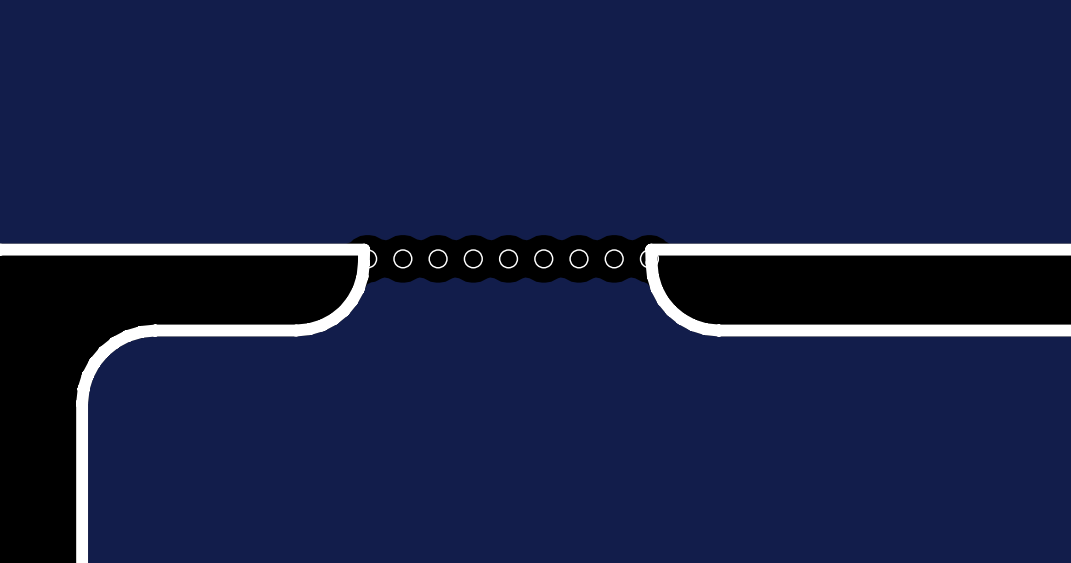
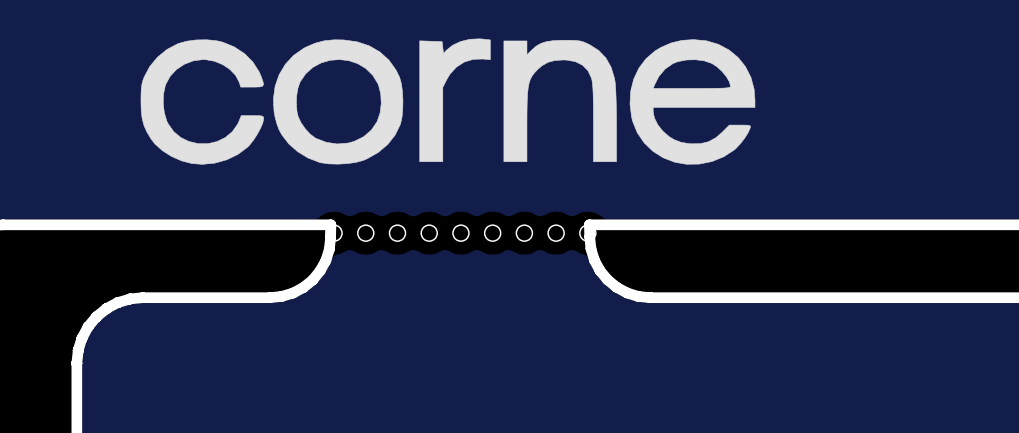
drawing: none -> [140, 38, 756, 165]

